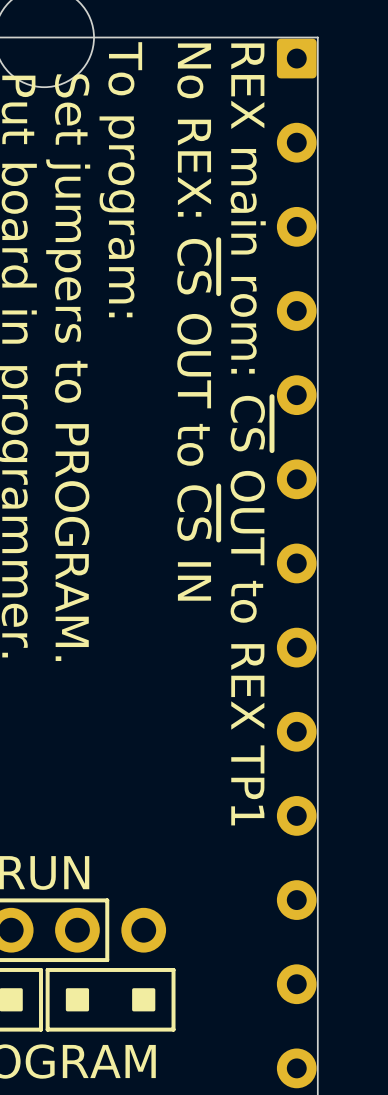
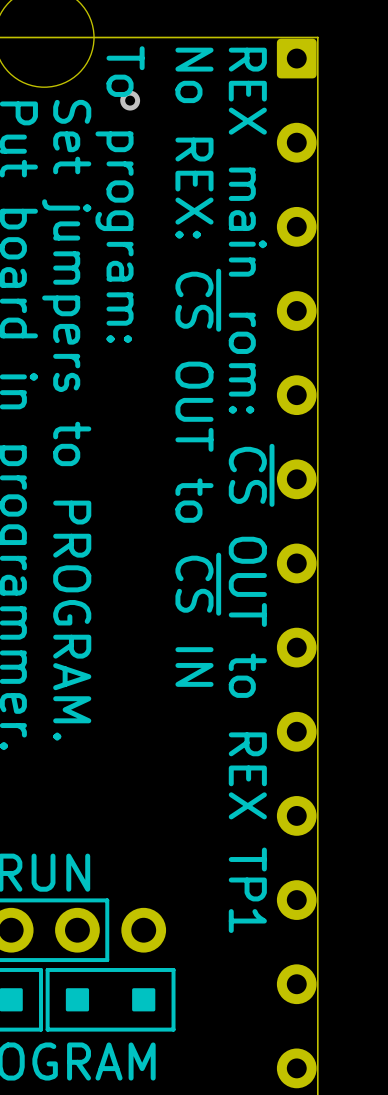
via: none -> (130, 100)

